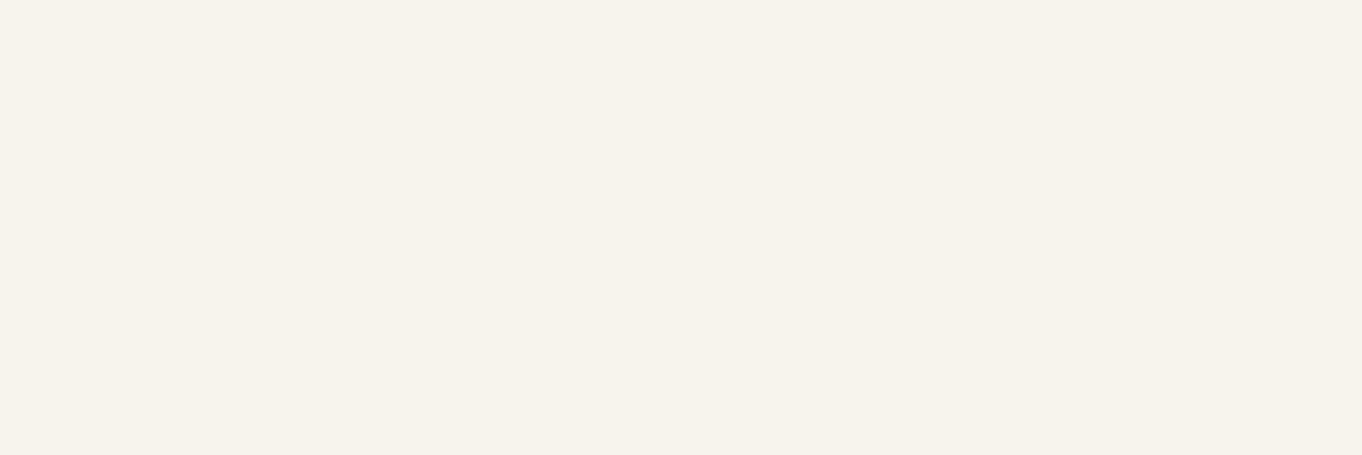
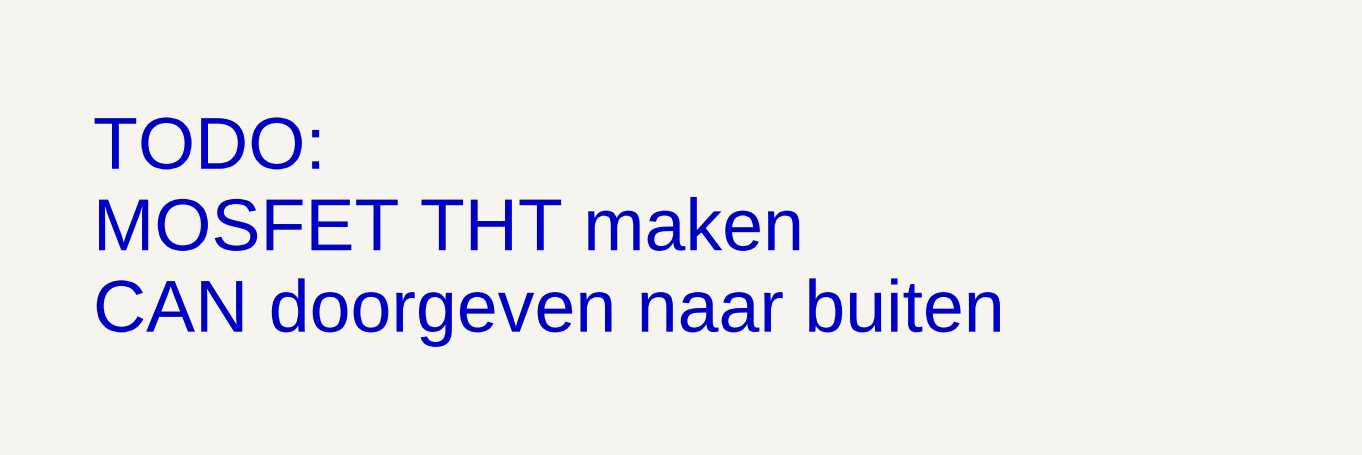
text: none -> TODO: (206, 143)
text: none -> MOSFET THT maken (449, 223)
text: none -> CAN doorgeven naar buiten (548, 312)

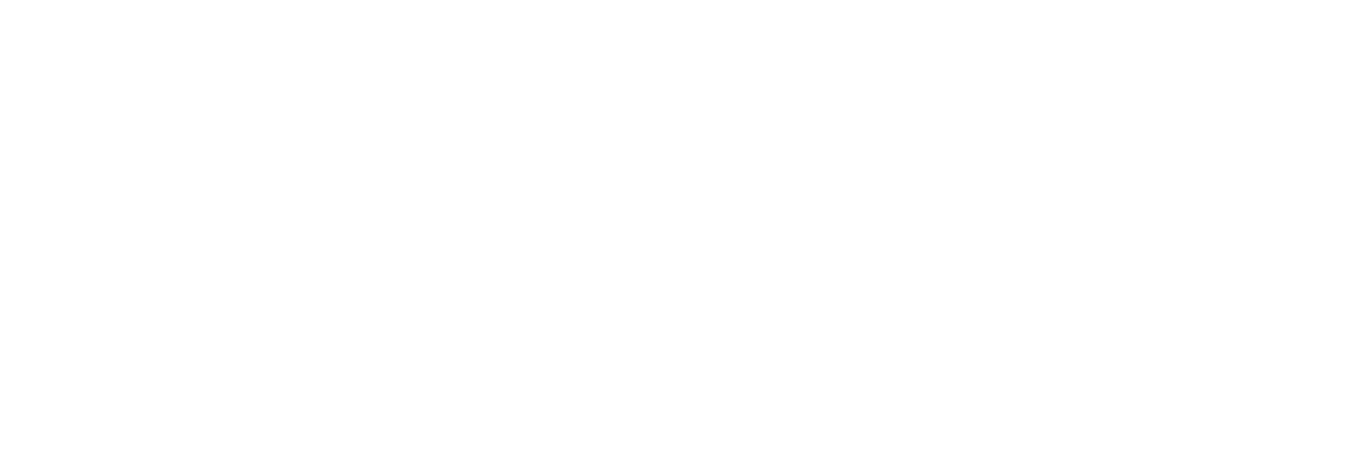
text: TODO: (206, 143) -> none
text: MOSFET THT maken (449, 223) -> none
text: CAN doorgeven naar buiten (548, 312) -> none

